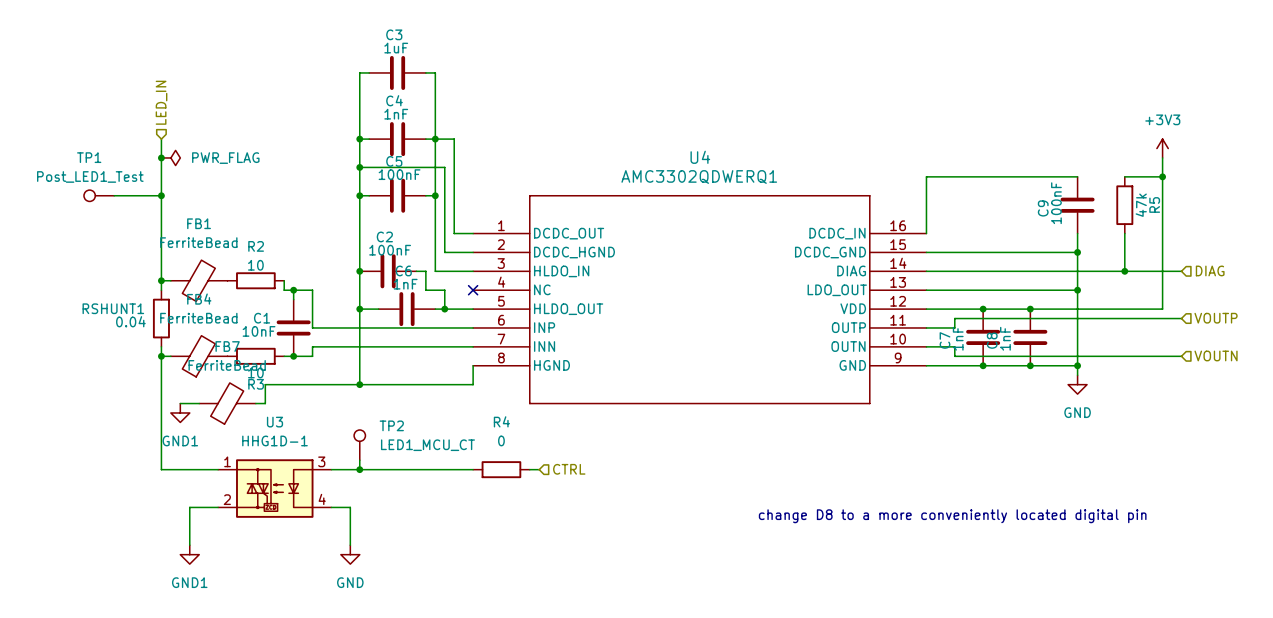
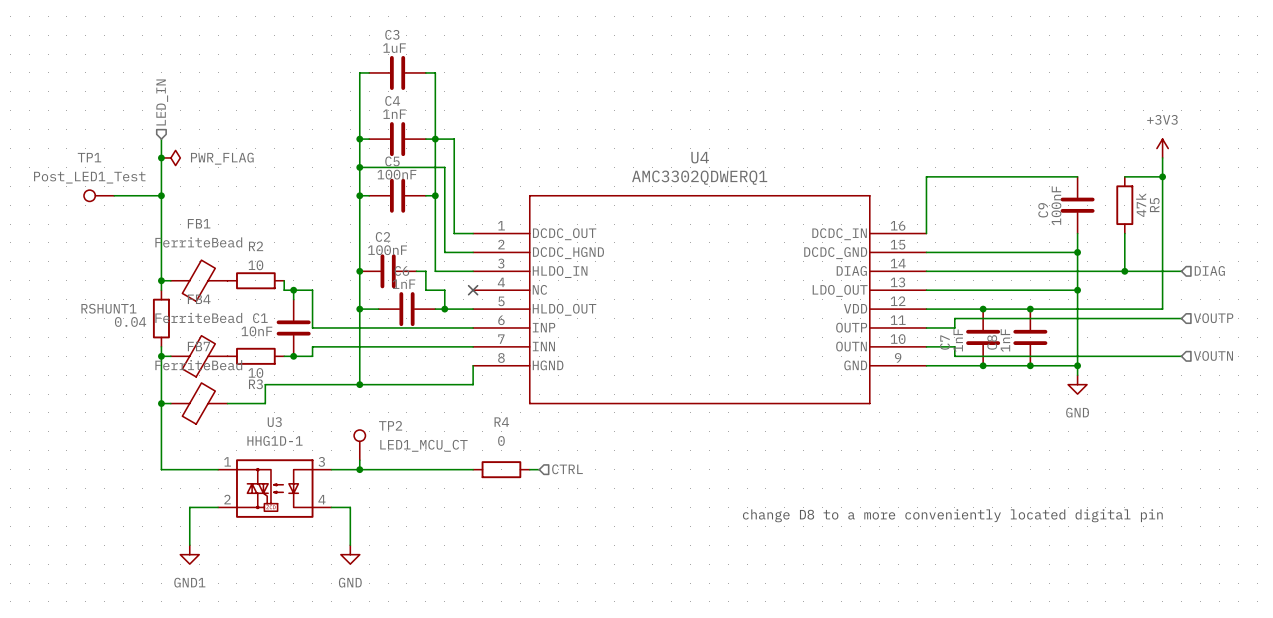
wire: none -> (161, 403) (170, 403)
junction: none -> (161, 403)
FB7 position: (227, 403) -> (199, 403)
power symbol: GND1 (180, 412) -> none

